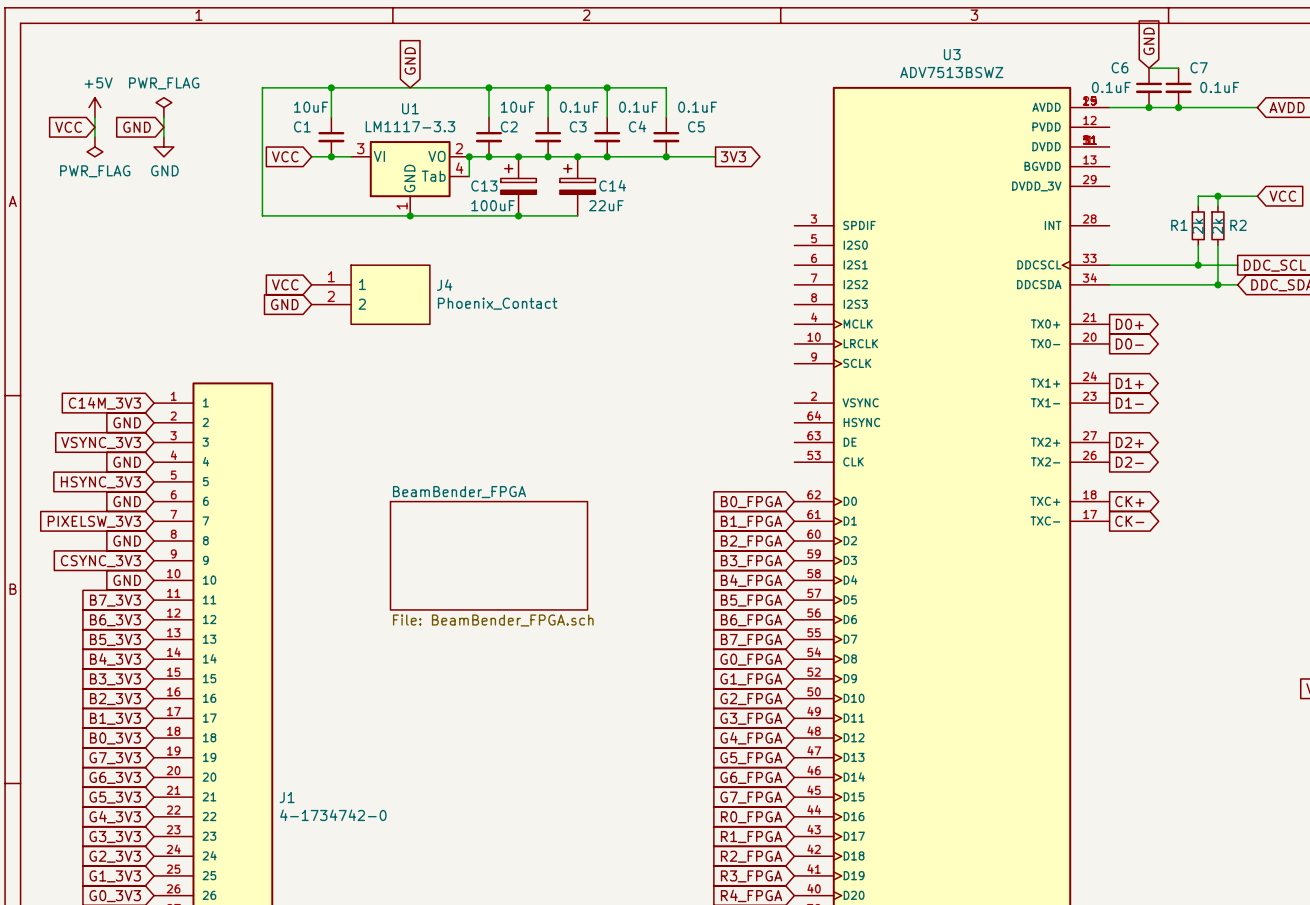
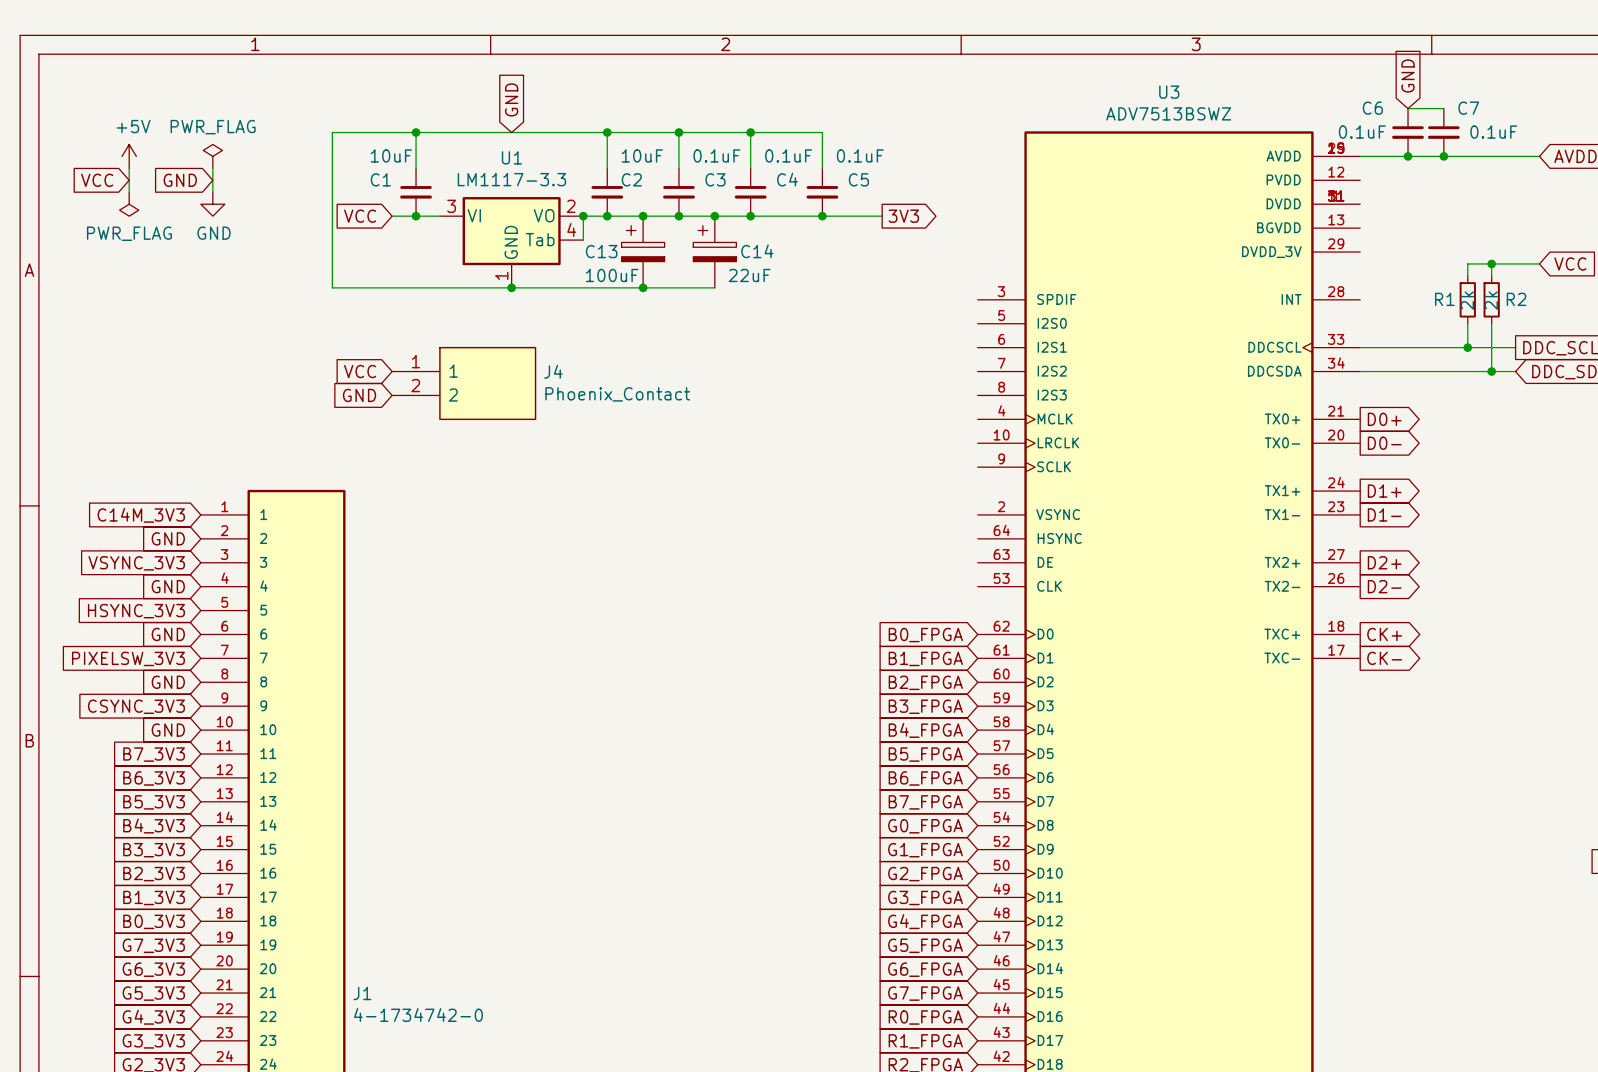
sheet BeamBender_FPGA: File: BeamBender_FPGA.sch (489, 555) -> none

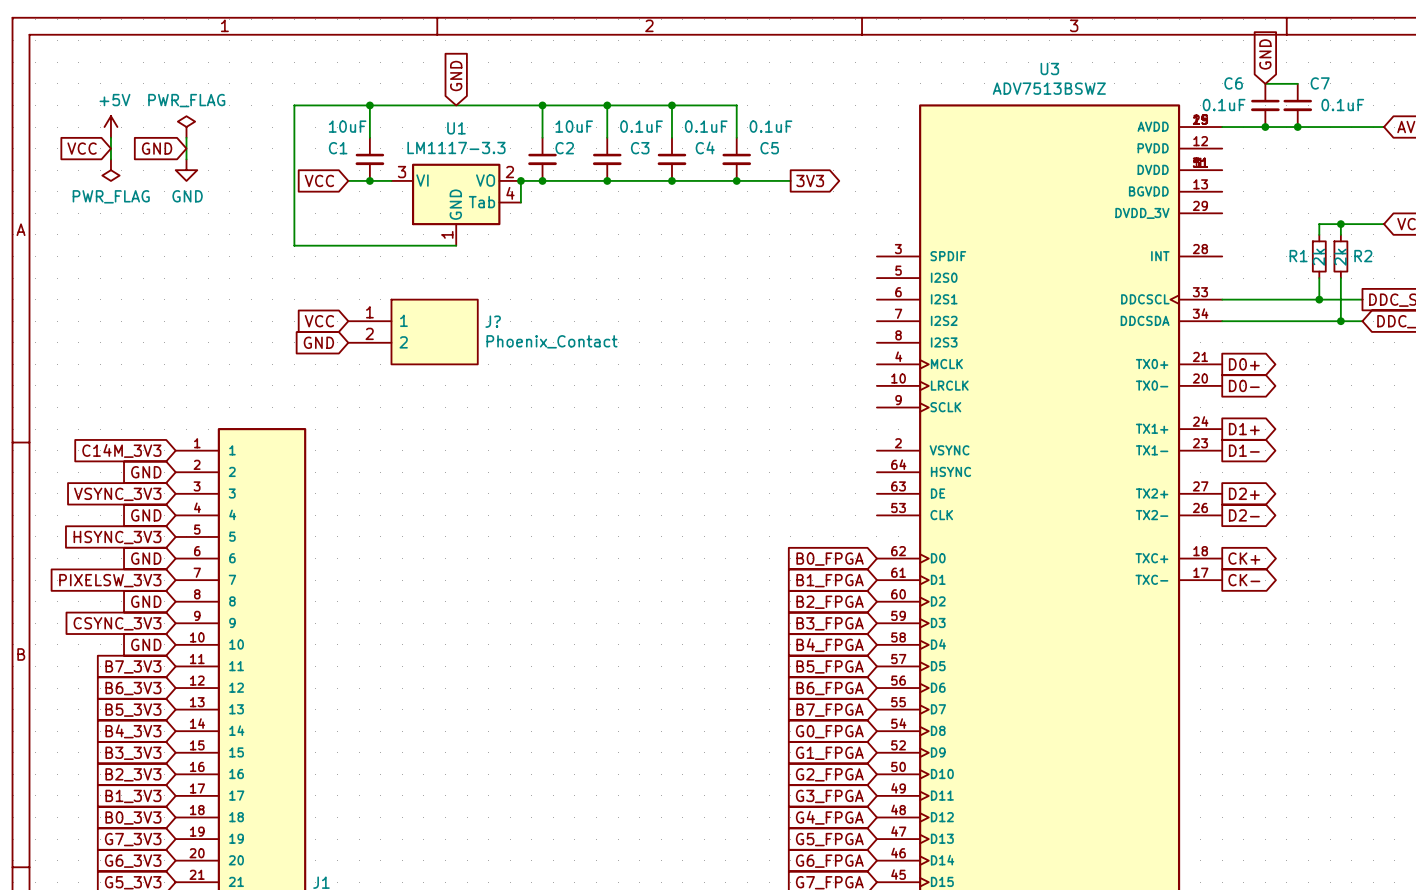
junction: (643, 216) -> none
junction: (714, 216) -> none
C13: 100uF (643, 252) -> none
C14: 22uF (714, 252) -> none
wire: (511, 287) (714, 287) -> none
junction: (511, 287) -> none
junction: (643, 287) -> none
J4 name: J4 (553, 371) -> J? (493, 321)

